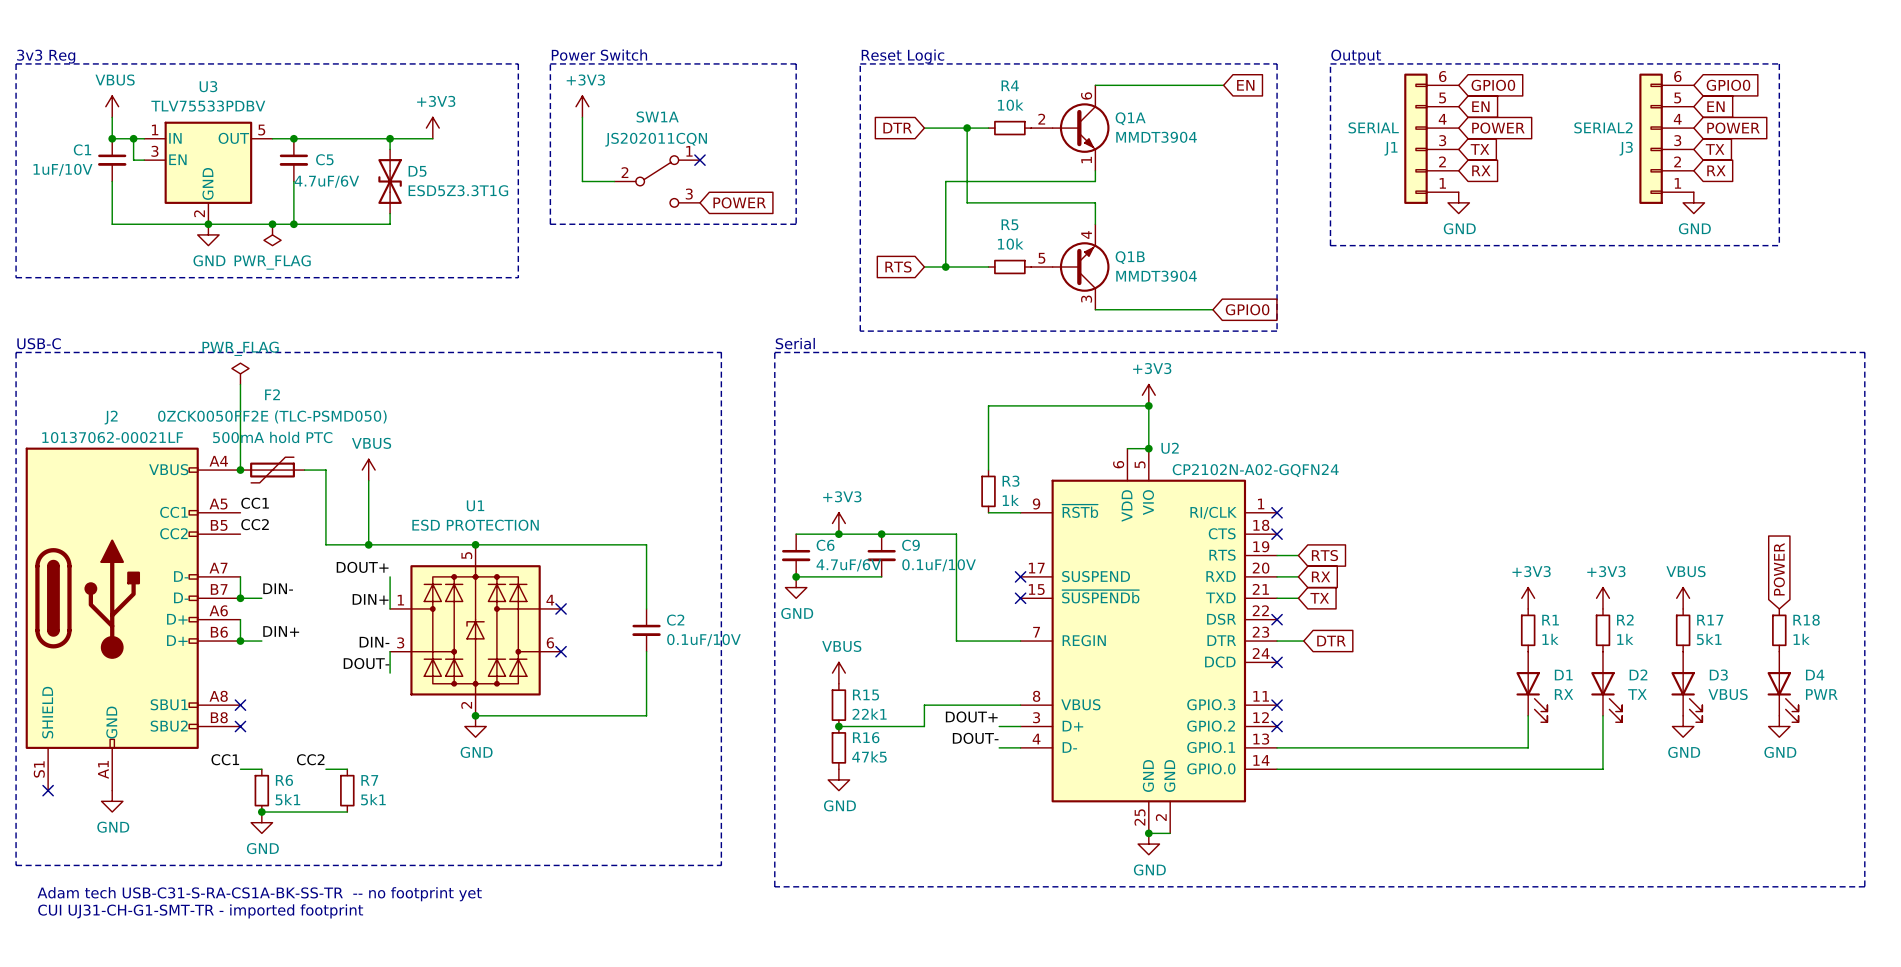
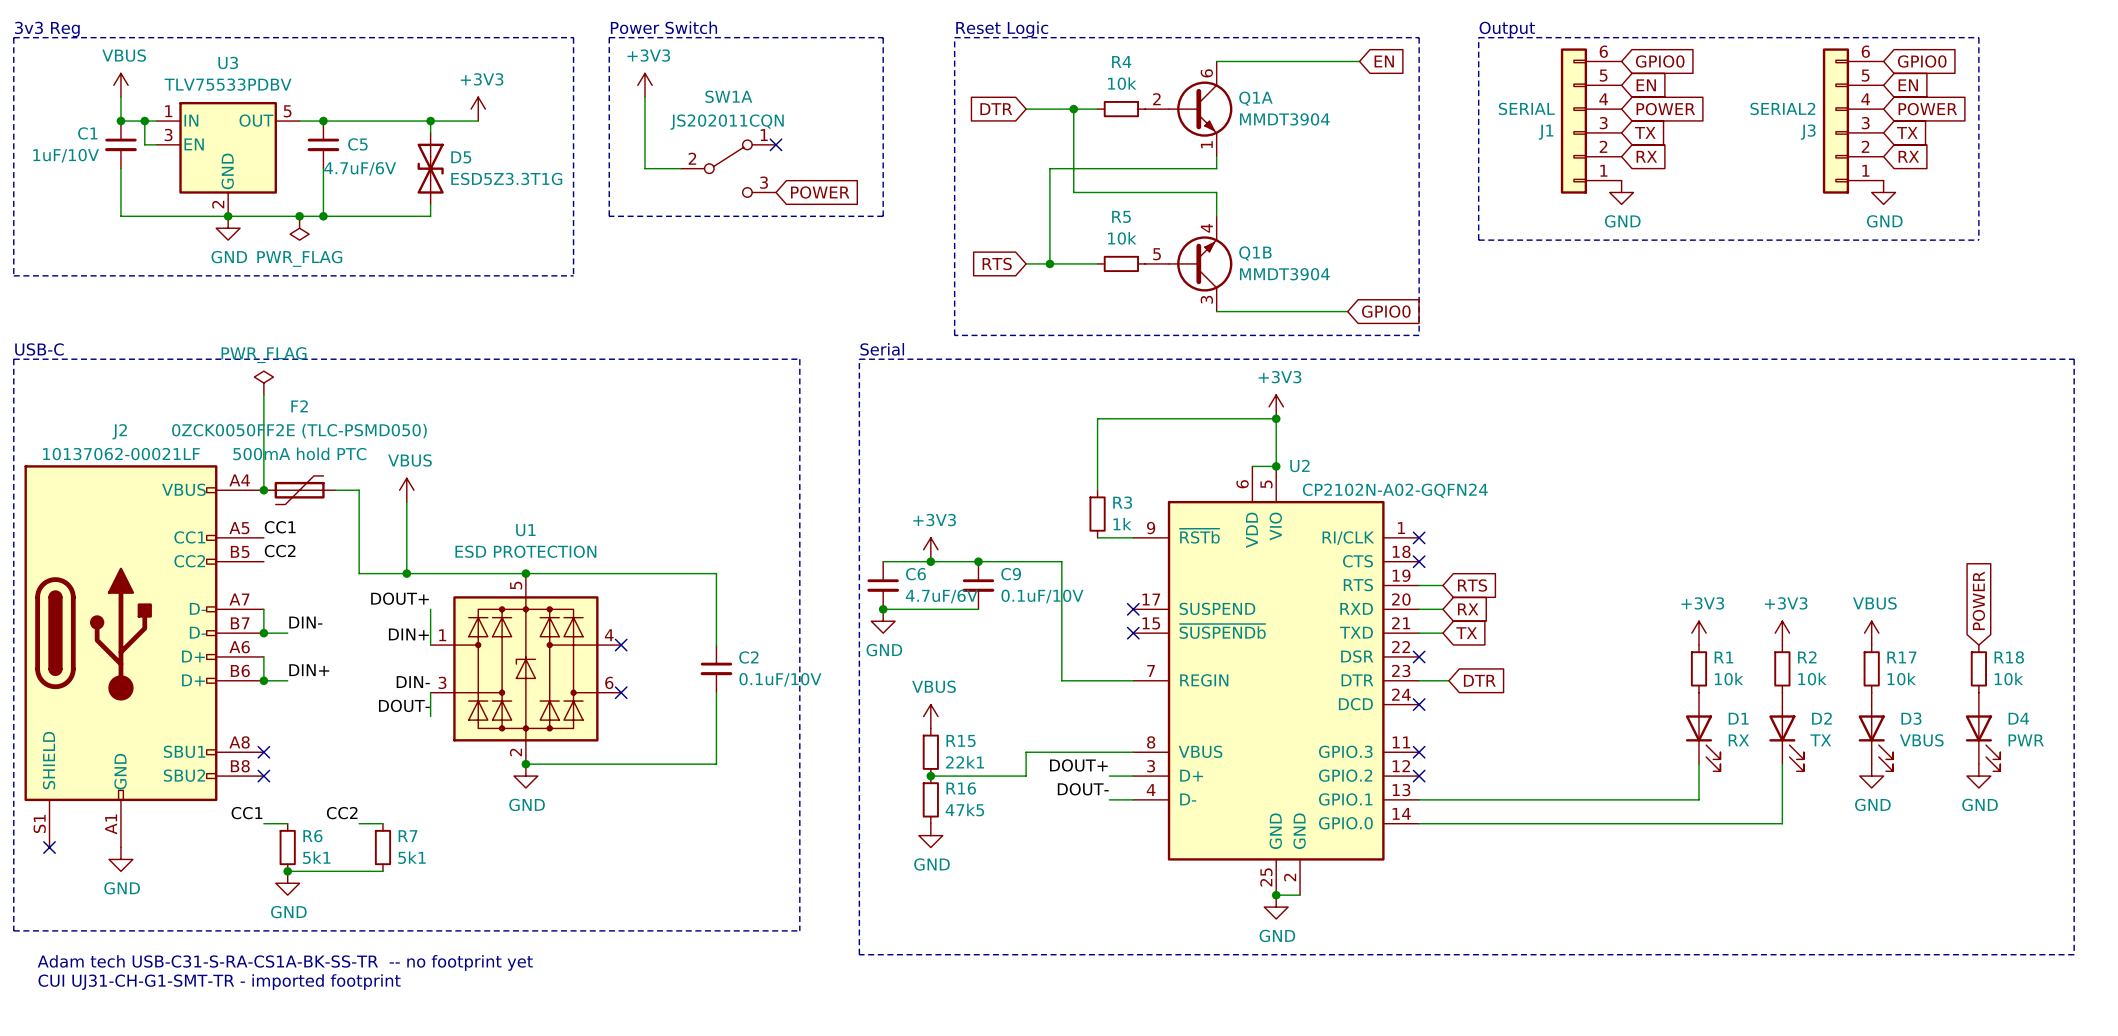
R1 value: 1k (1550, 639) -> 10k (1729, 679)
R2 value: 1k (1625, 639) -> 10k (1812, 679)
R17 value: 5k1 (1709, 639) -> 10k (1901, 679)
R18 value: 1k (1801, 639) -> 10k (2008, 679)

